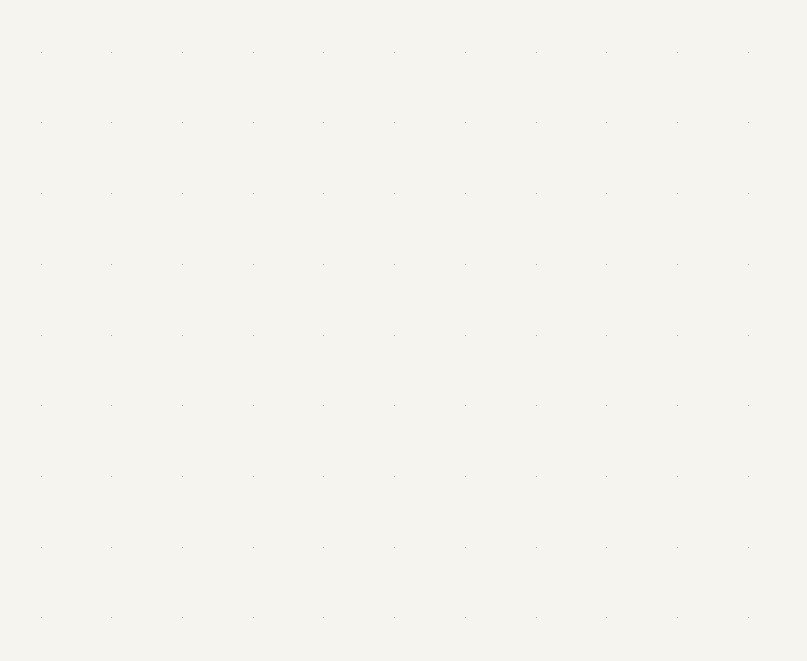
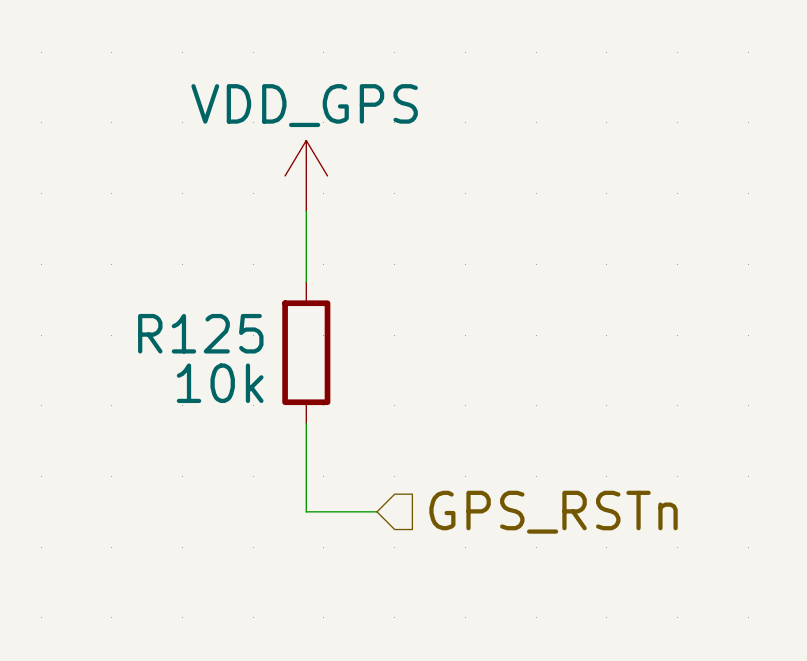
power symbol: none -> VDD_GPS (306, 175)
wire: none -> (306, 211) (306, 282)
R125: none -> 10k (306, 352)
wire: none -> (306, 423) (306, 511) (377, 511)
hierarchical label: none -> GPS_RSTn (553, 512)

